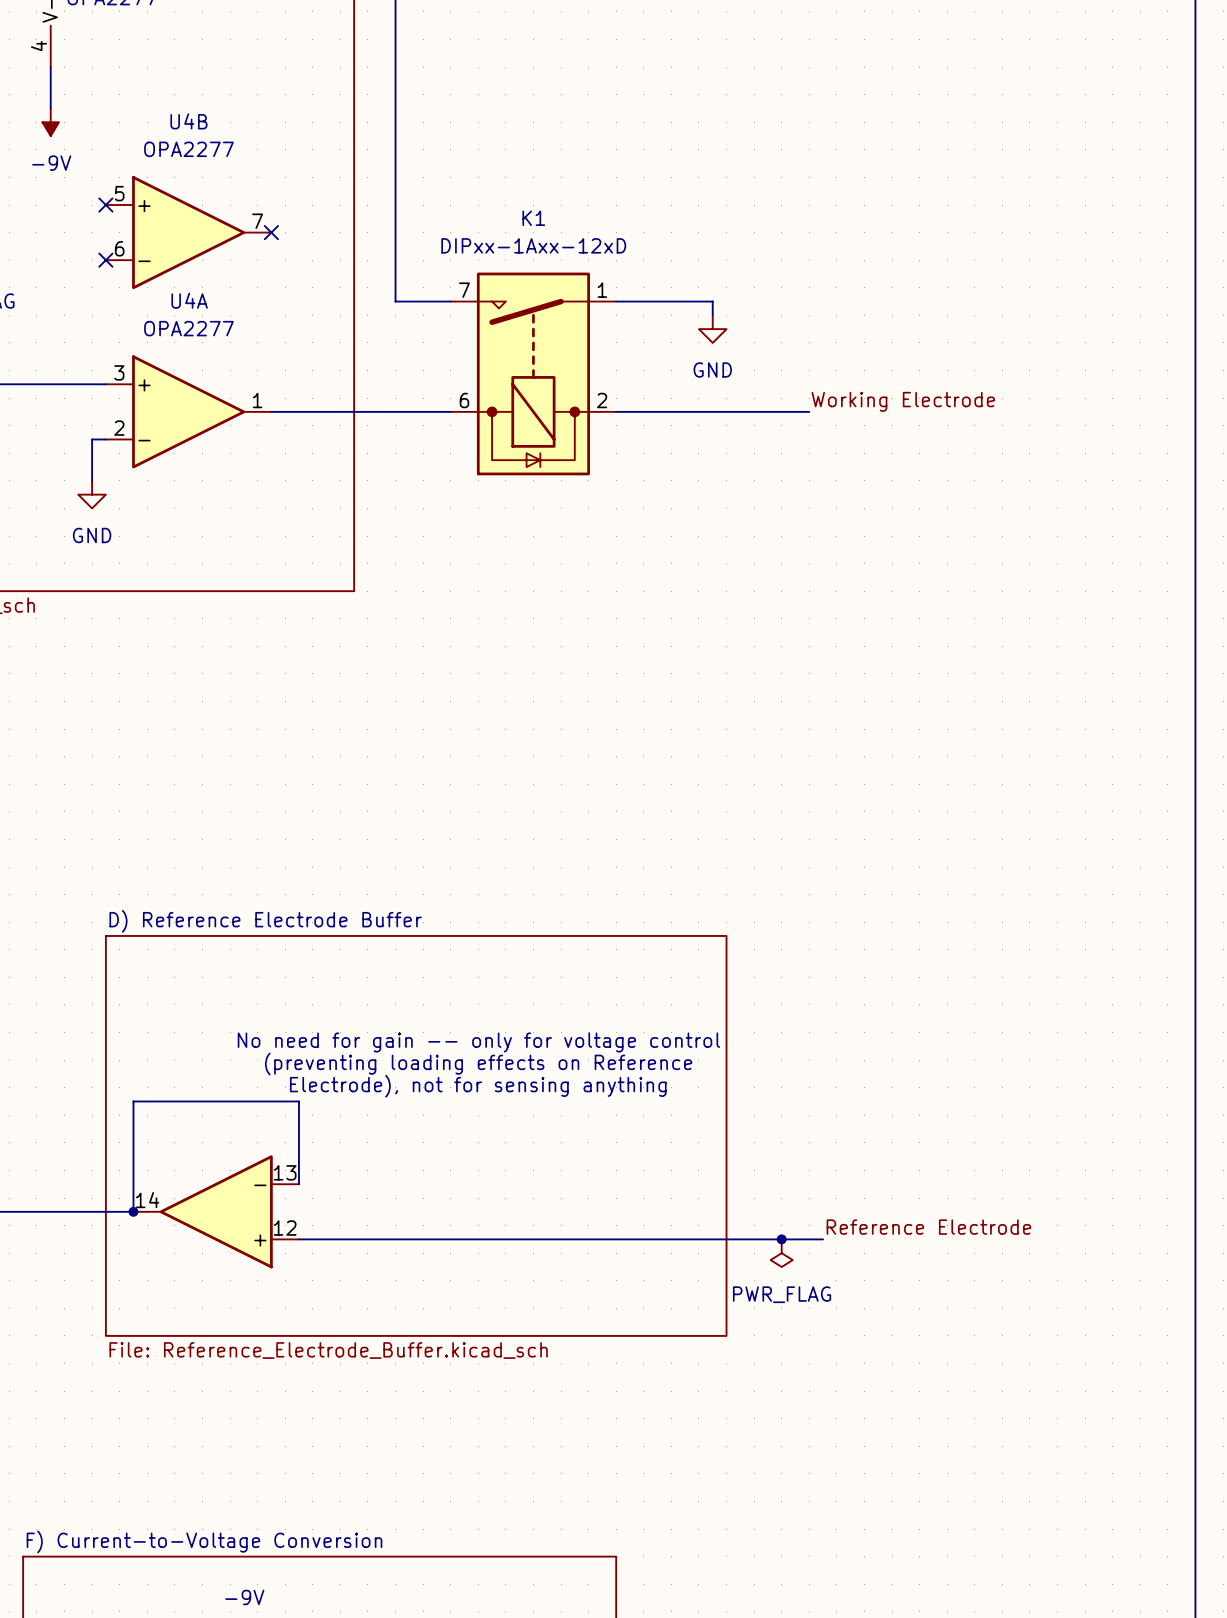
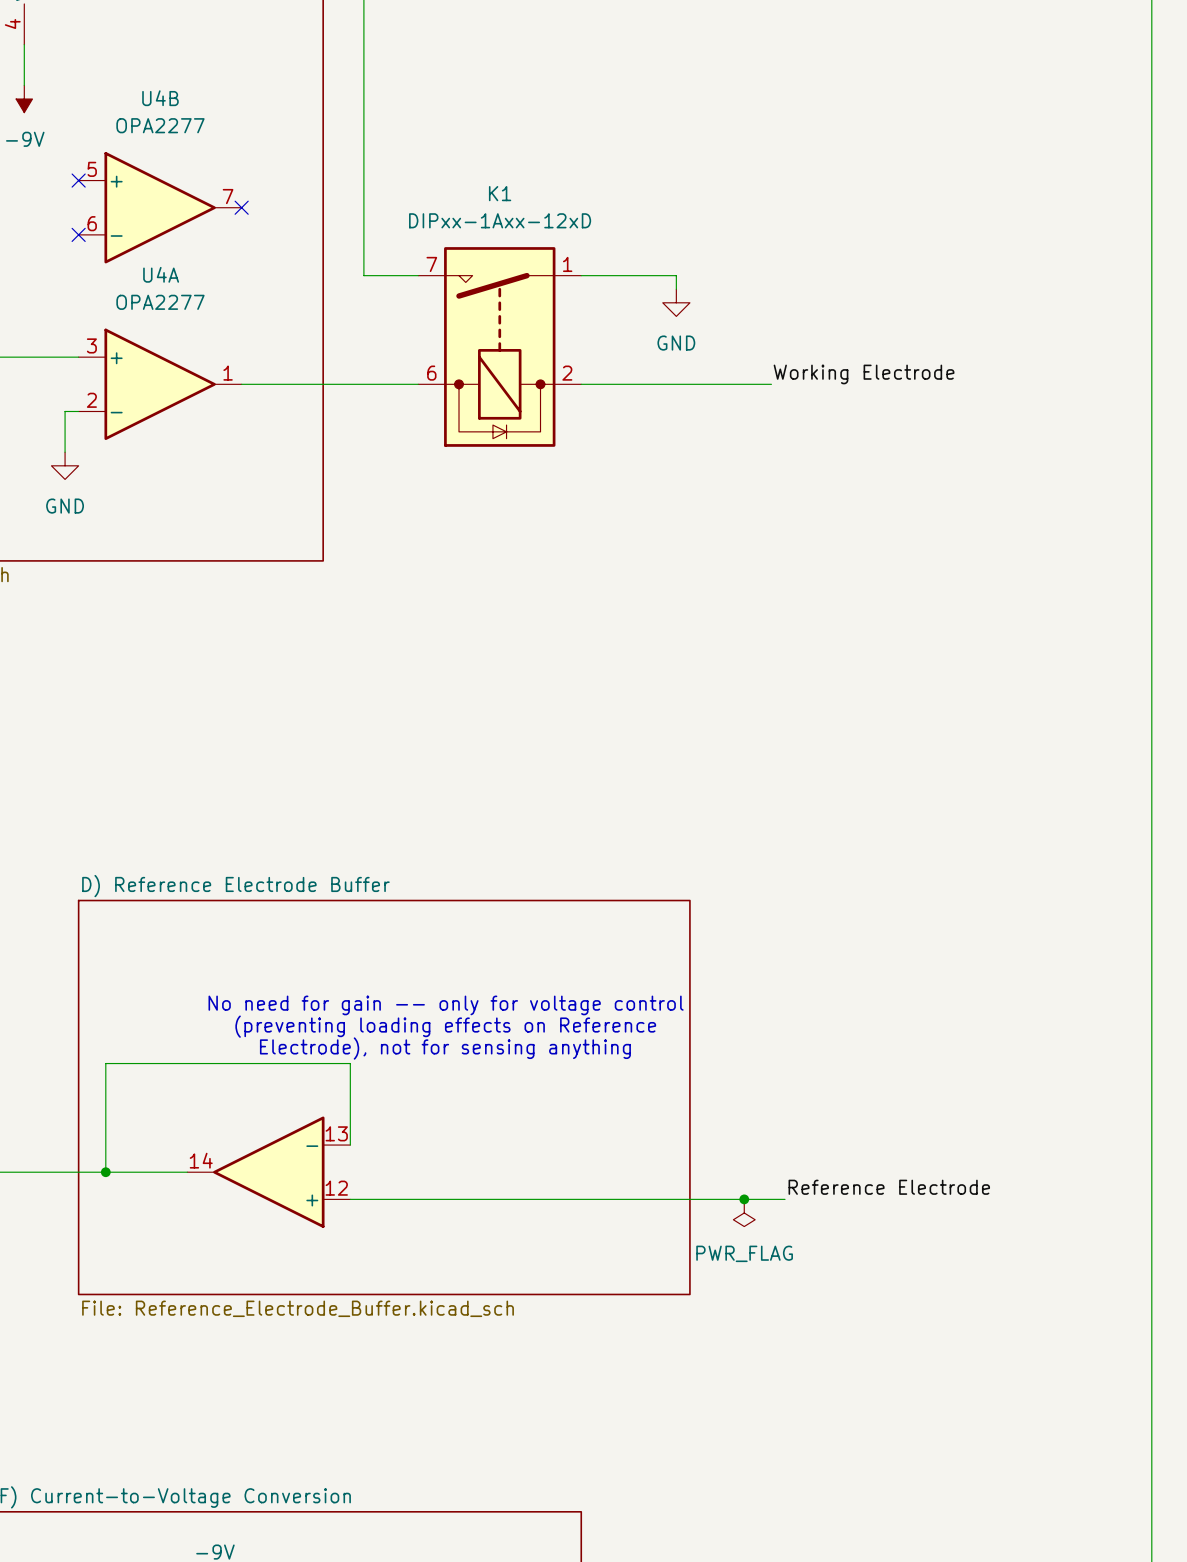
wire: (298, 1101) (298, 1184) -> (268, 1063) (350, 1063) (350, 1145)
part position: (216, 1211) -> (268, 1172)

